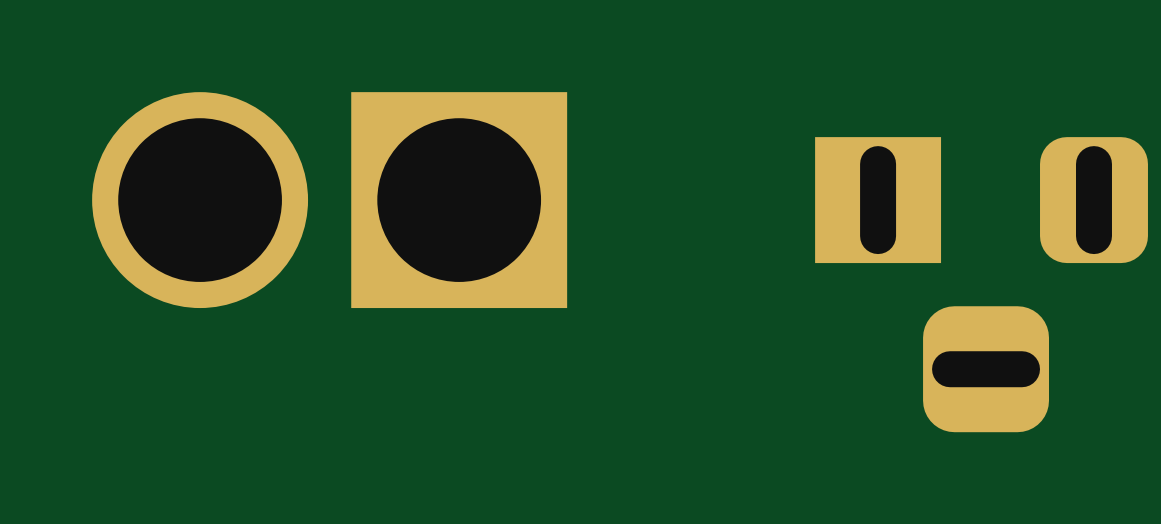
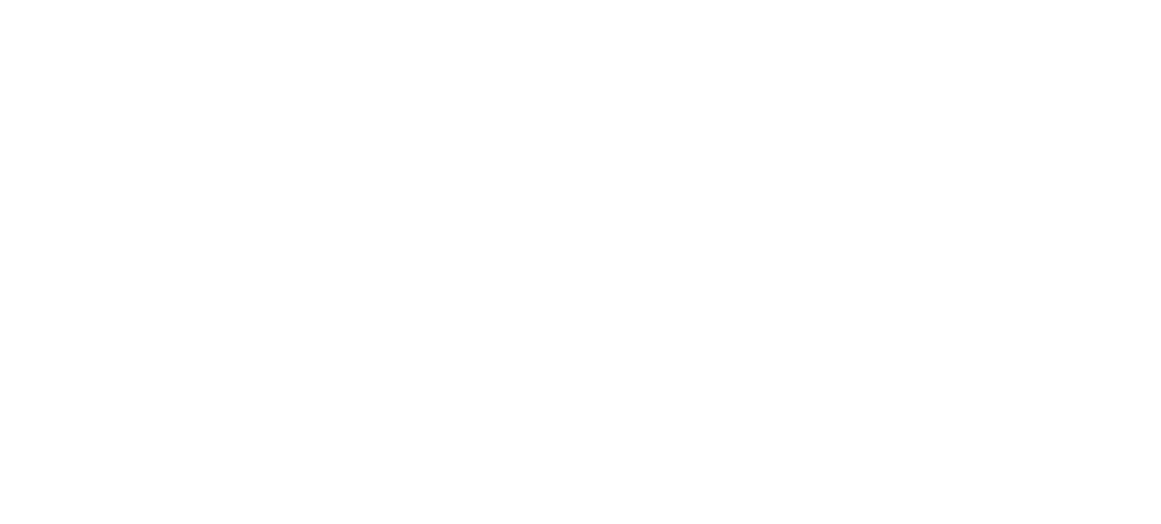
part: (329, 200) -> none
part: (981, 284) -> none

